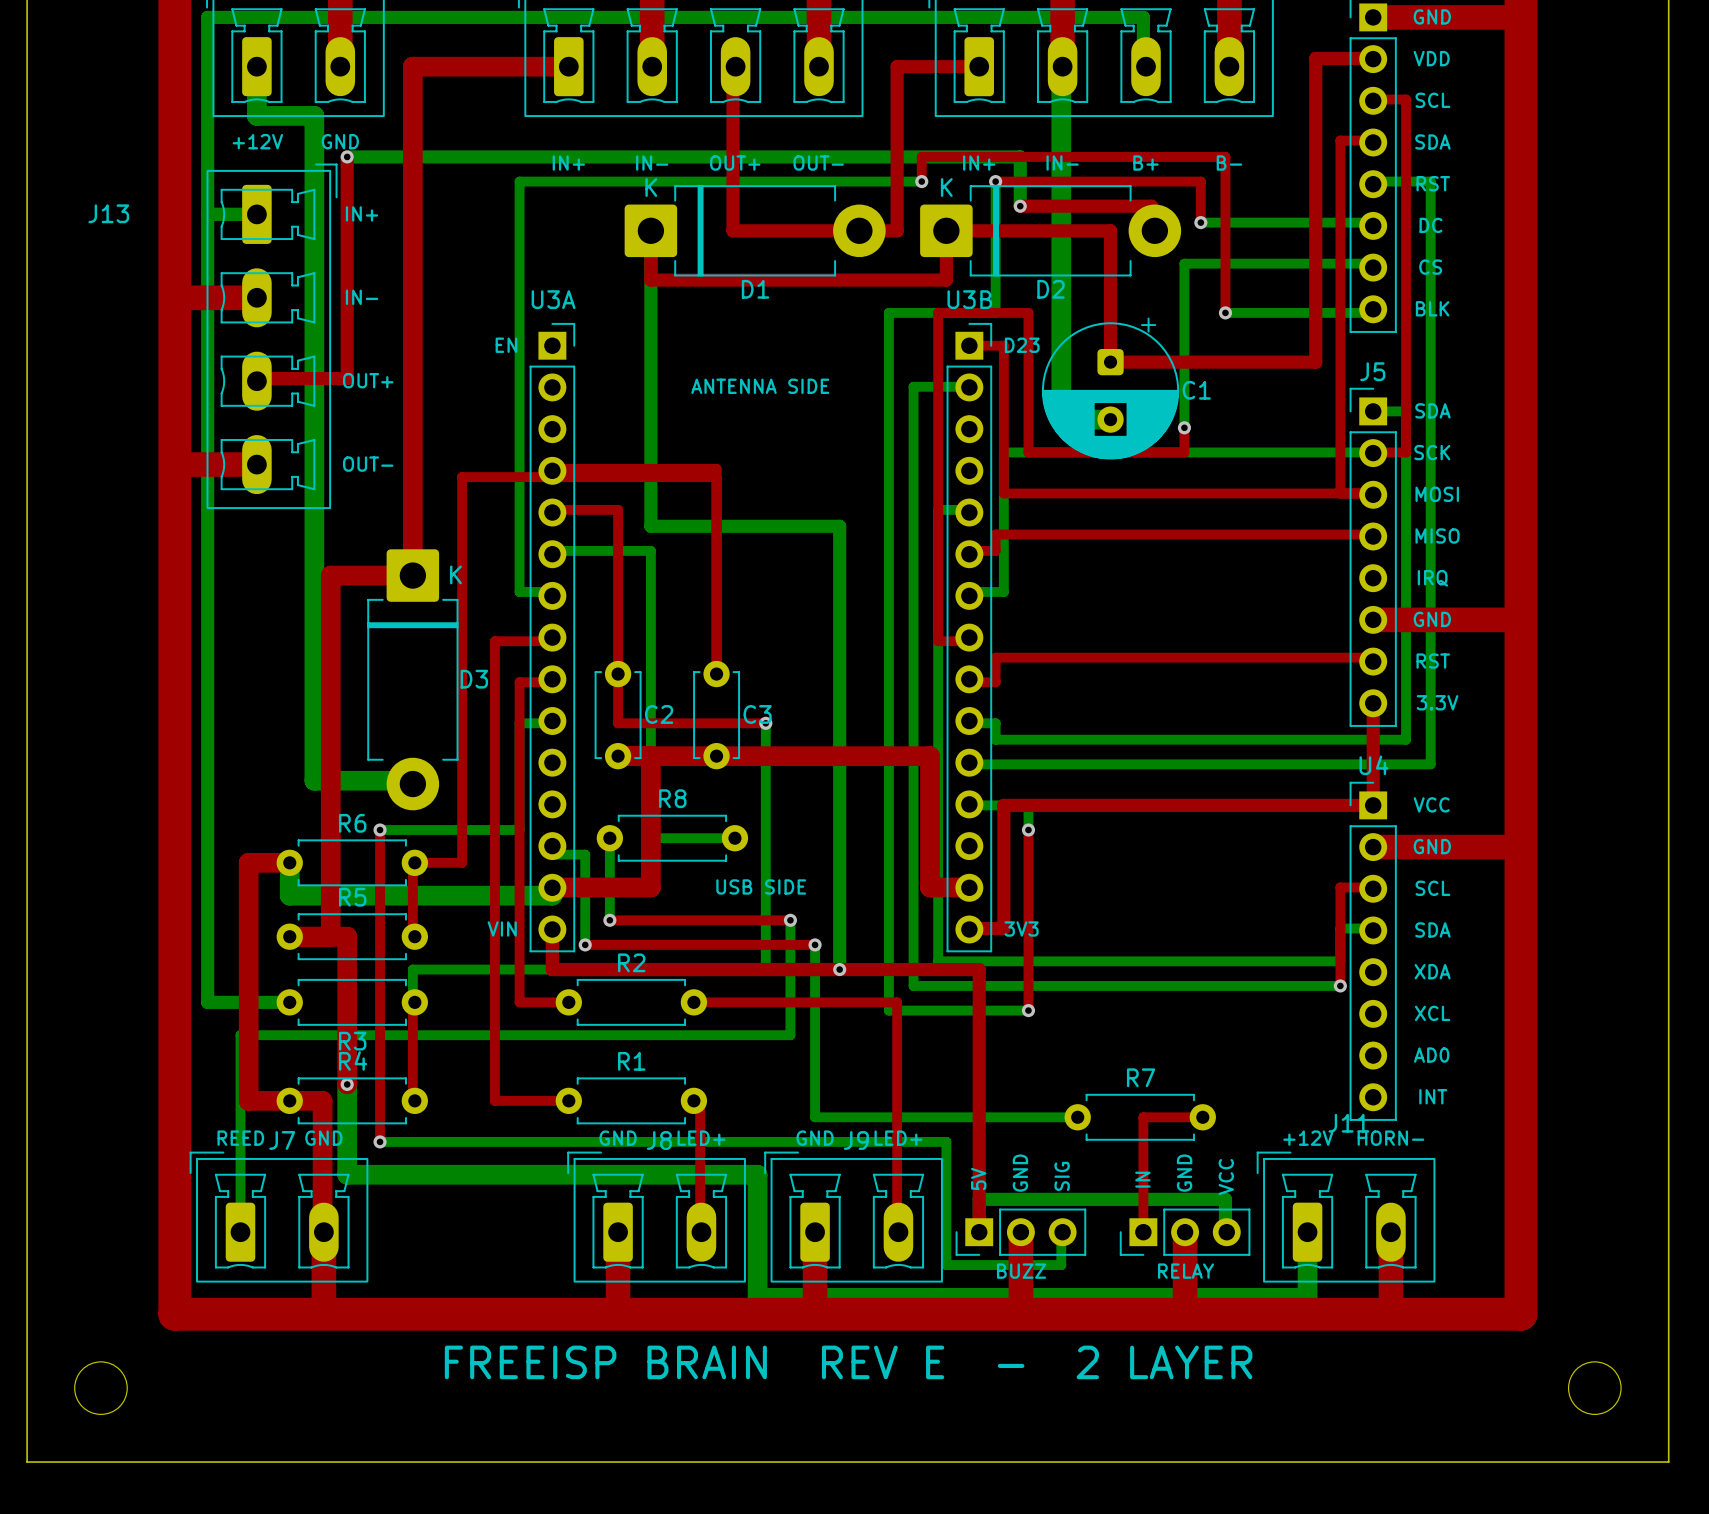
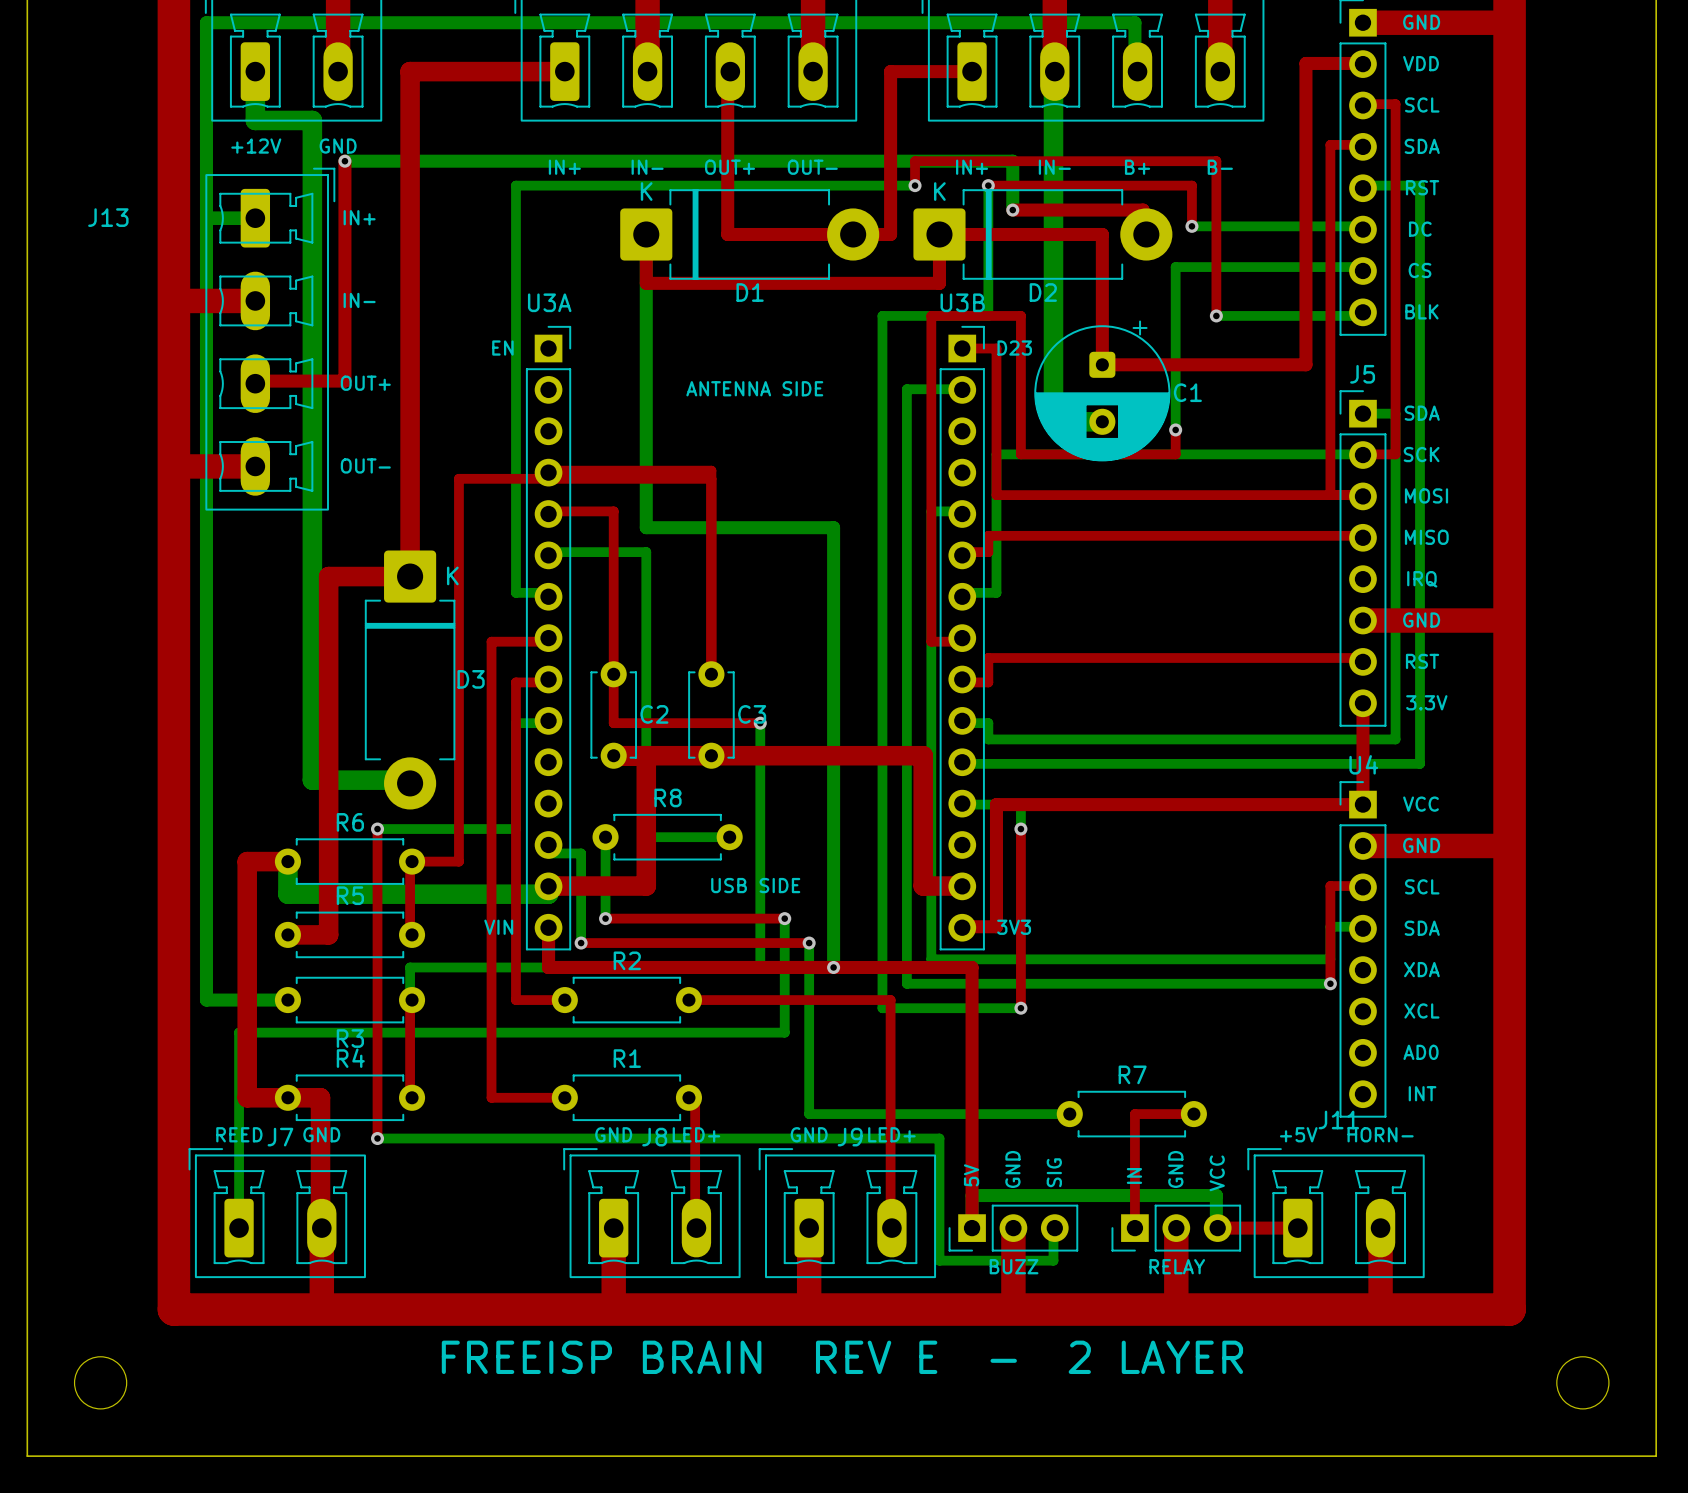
top track: (330, 936) (347, 936) (347, 1084) -> none
bottom track: (347, 1084) (347, 1174) (757, 1174) (757, 1297) (1307, 1297) (1307, 1232) -> none
via: (347, 1084) -> none
text: +12V (1308, 1138) -> +5V (1298, 1134)
top track: none -> (1217, 1228) (1297, 1228)

